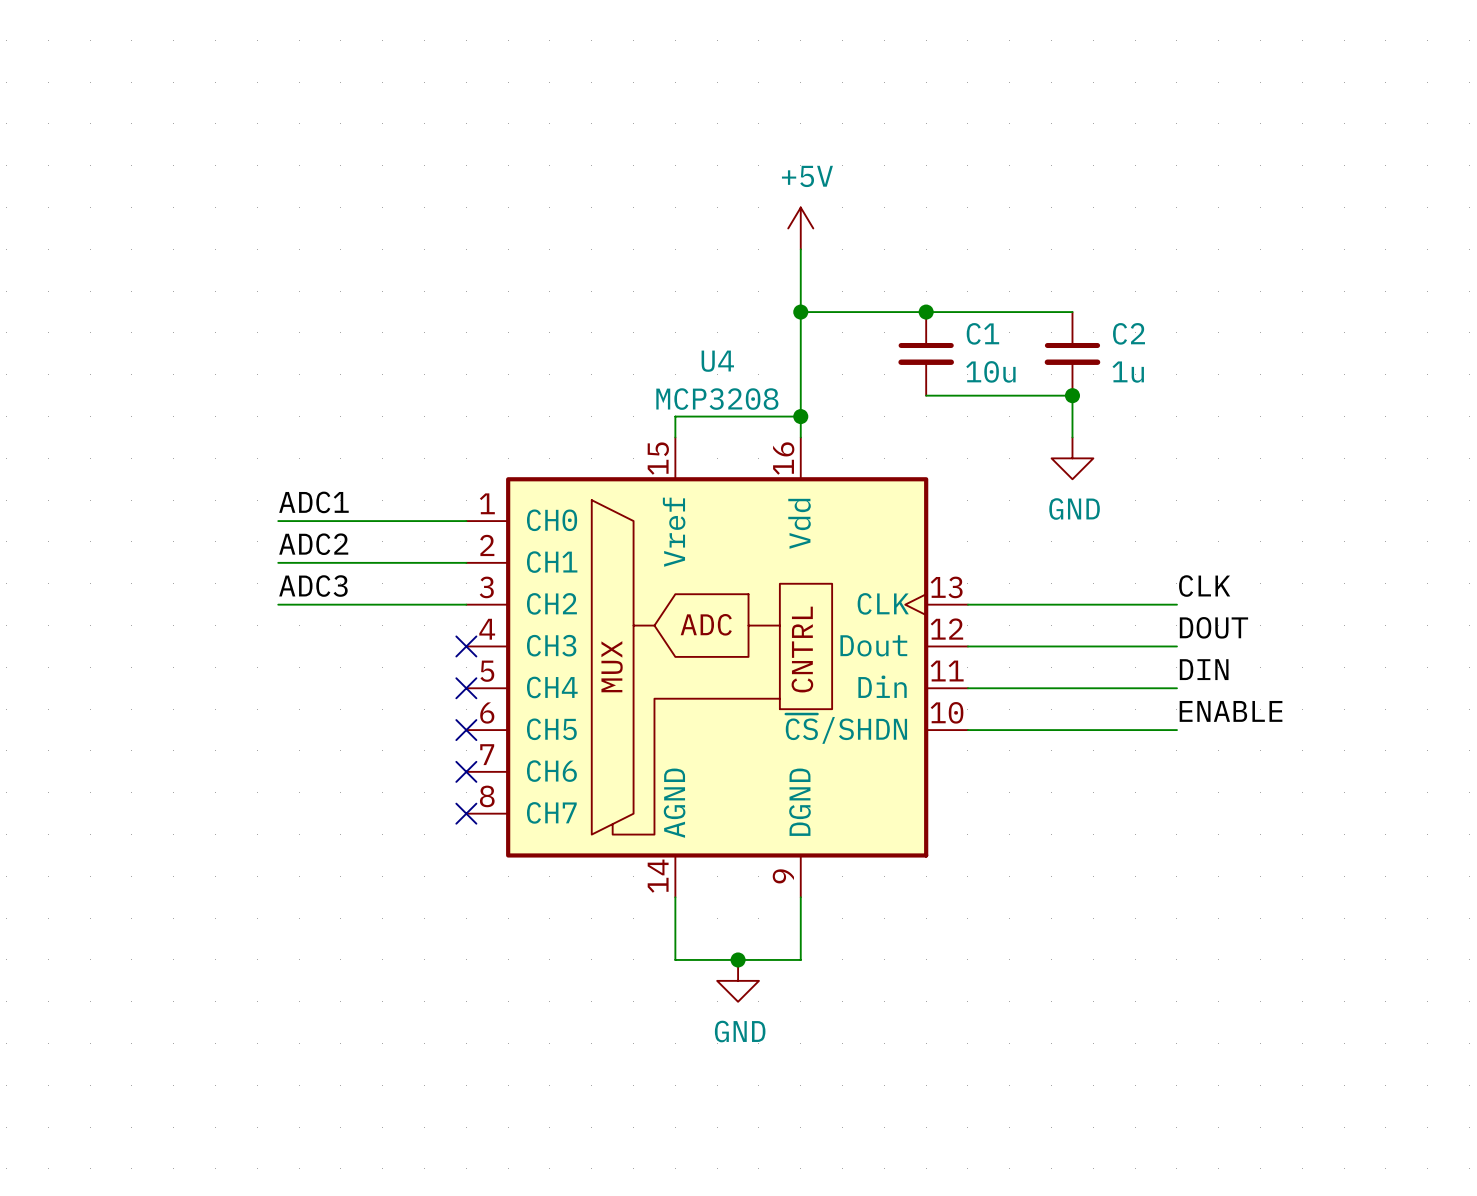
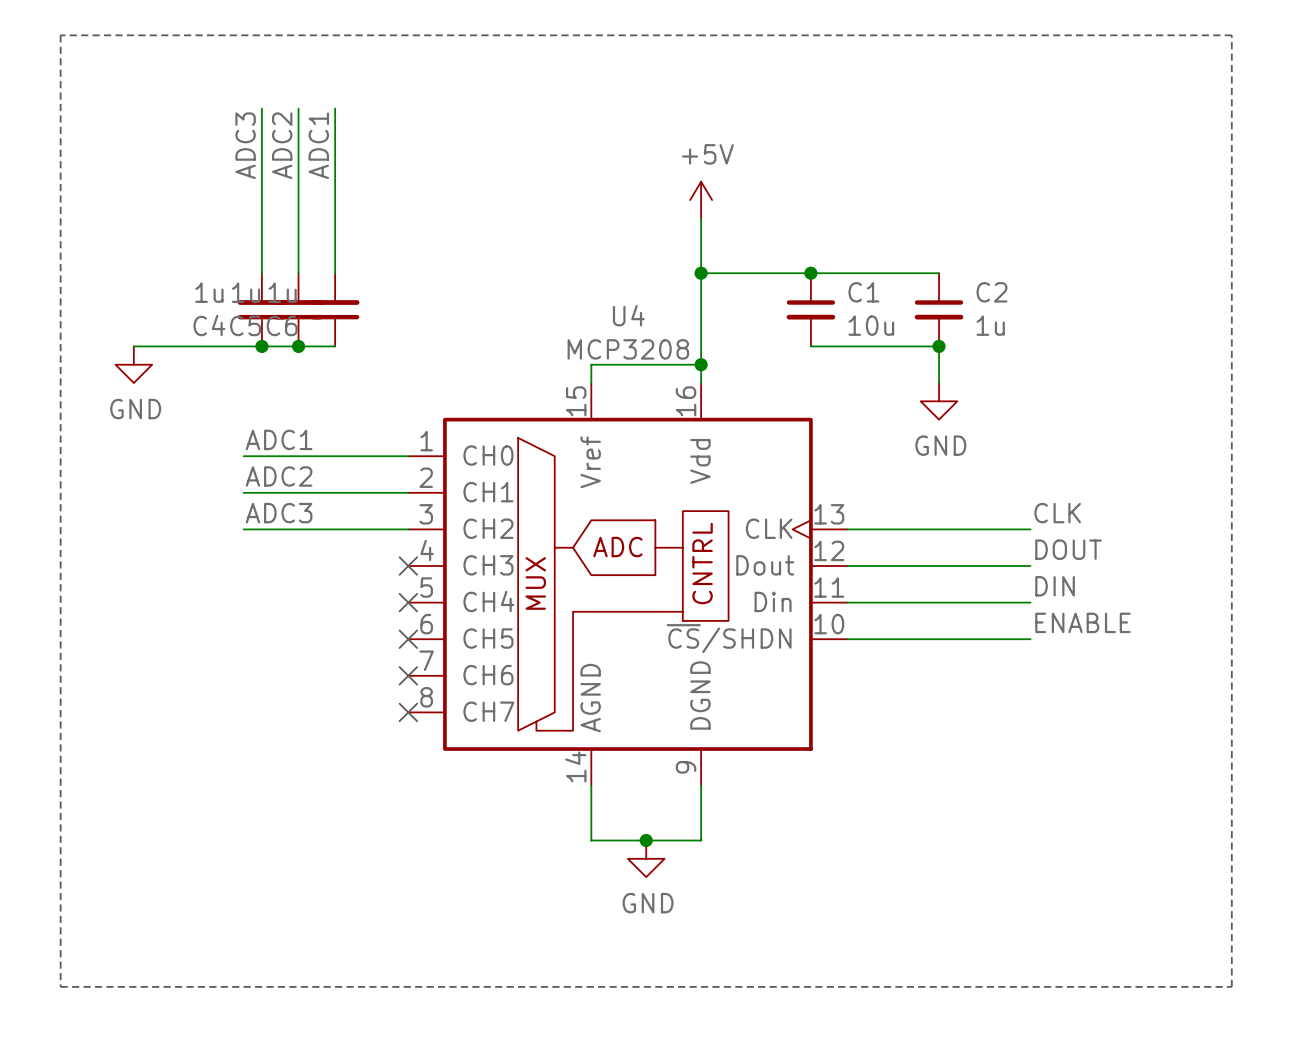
line: none -> (60, 35) (1231, 35) (1231, 986) (60, 986) (60, 35)
wire: none -> (261, 108) (261, 273)
wire: none -> (298, 108) (298, 273)
wire: none -> (335, 108) (335, 273)
label: none -> ADC3 (245, 145)
label: none -> ADC2 (282, 145)
label: none -> ADC1 (318, 145)
C4: none -> 1u (261, 309)
C5: none -> 1u (298, 309)
C6: none -> 1u (335, 309)
wire: none -> (133, 346) (335, 346)
junction: none -> (261, 346)
junction: none -> (298, 346)
power symbol: none -> GND (133, 364)

